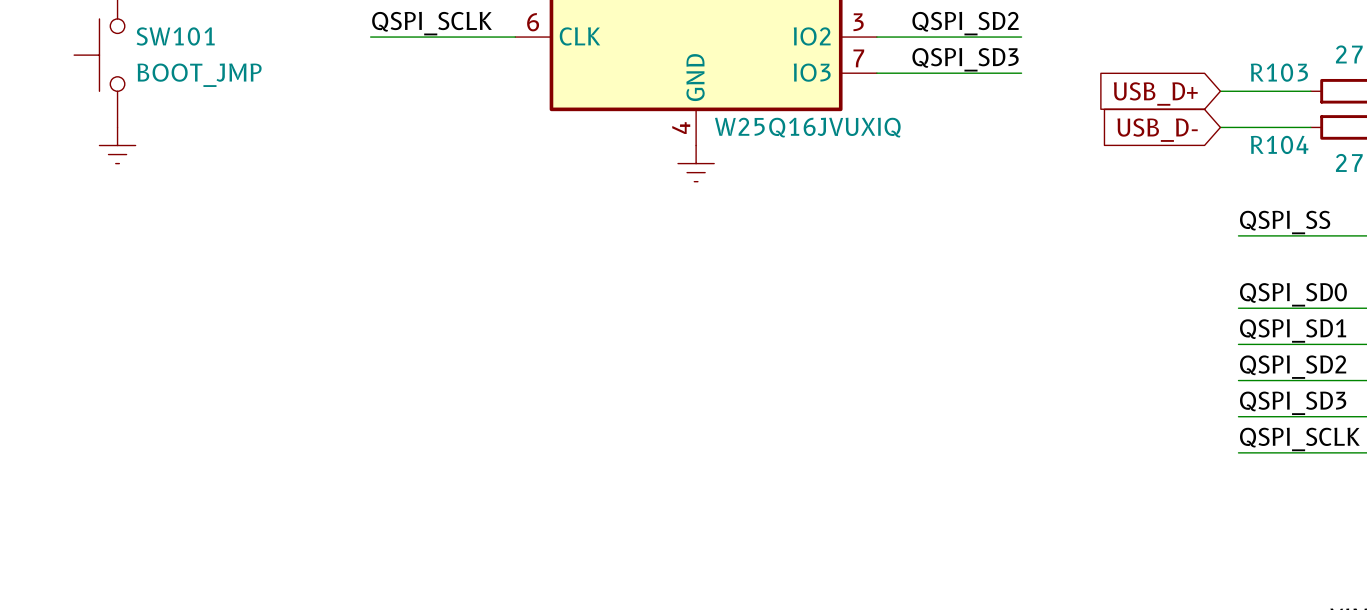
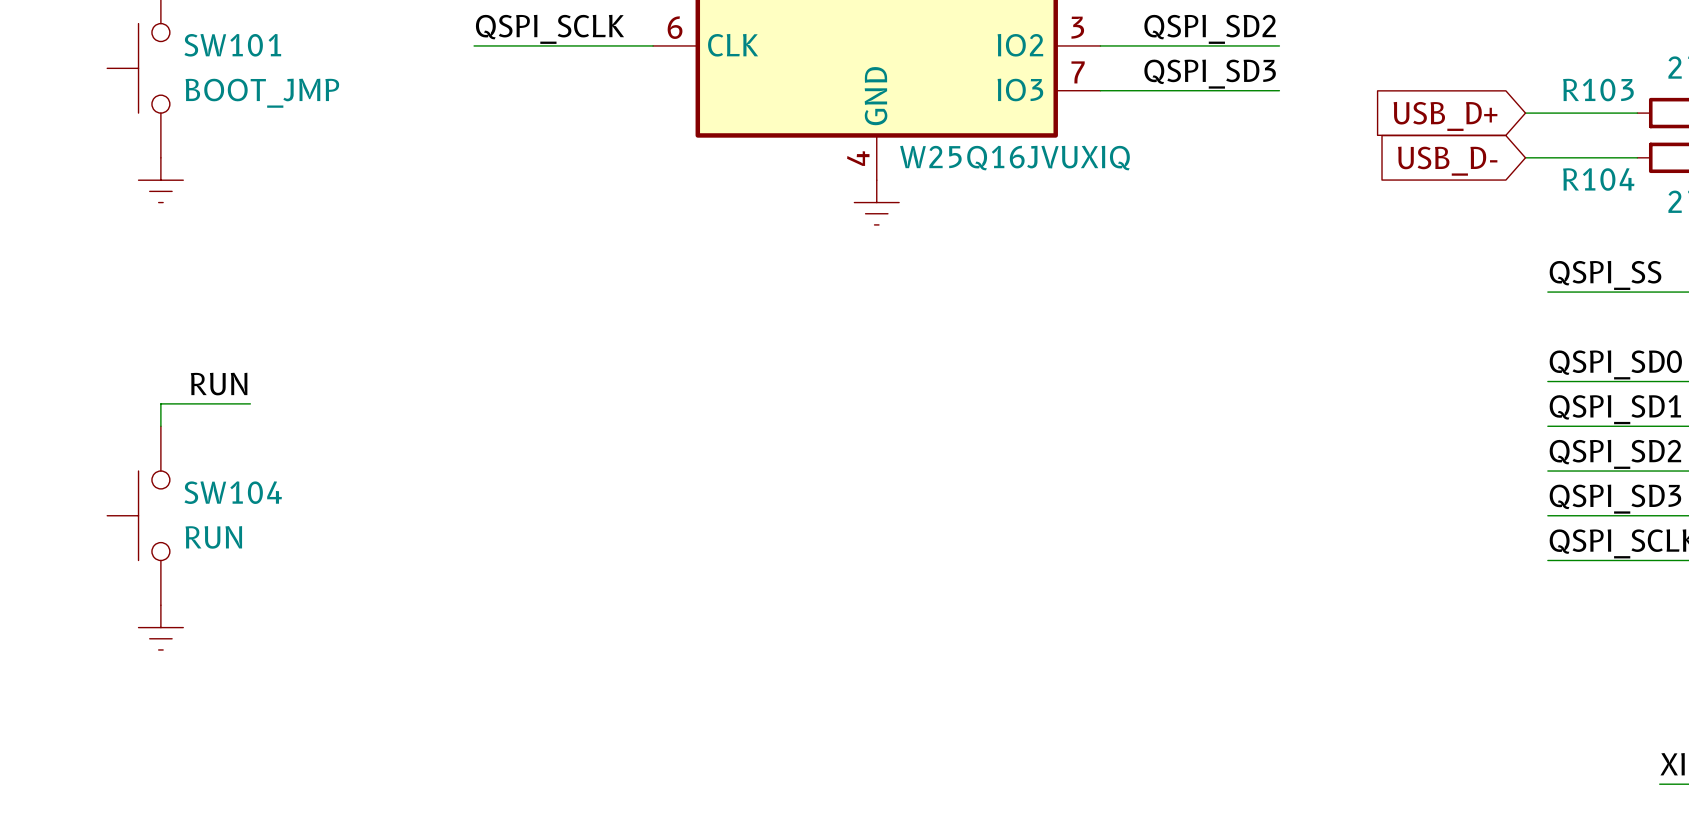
label: none -> RUN (219, 384)
wire: none -> (250, 403) (160, 403) (160, 426)
SW104: none -> RUN (138, 515)
power symbol: none -> (160, 627)

